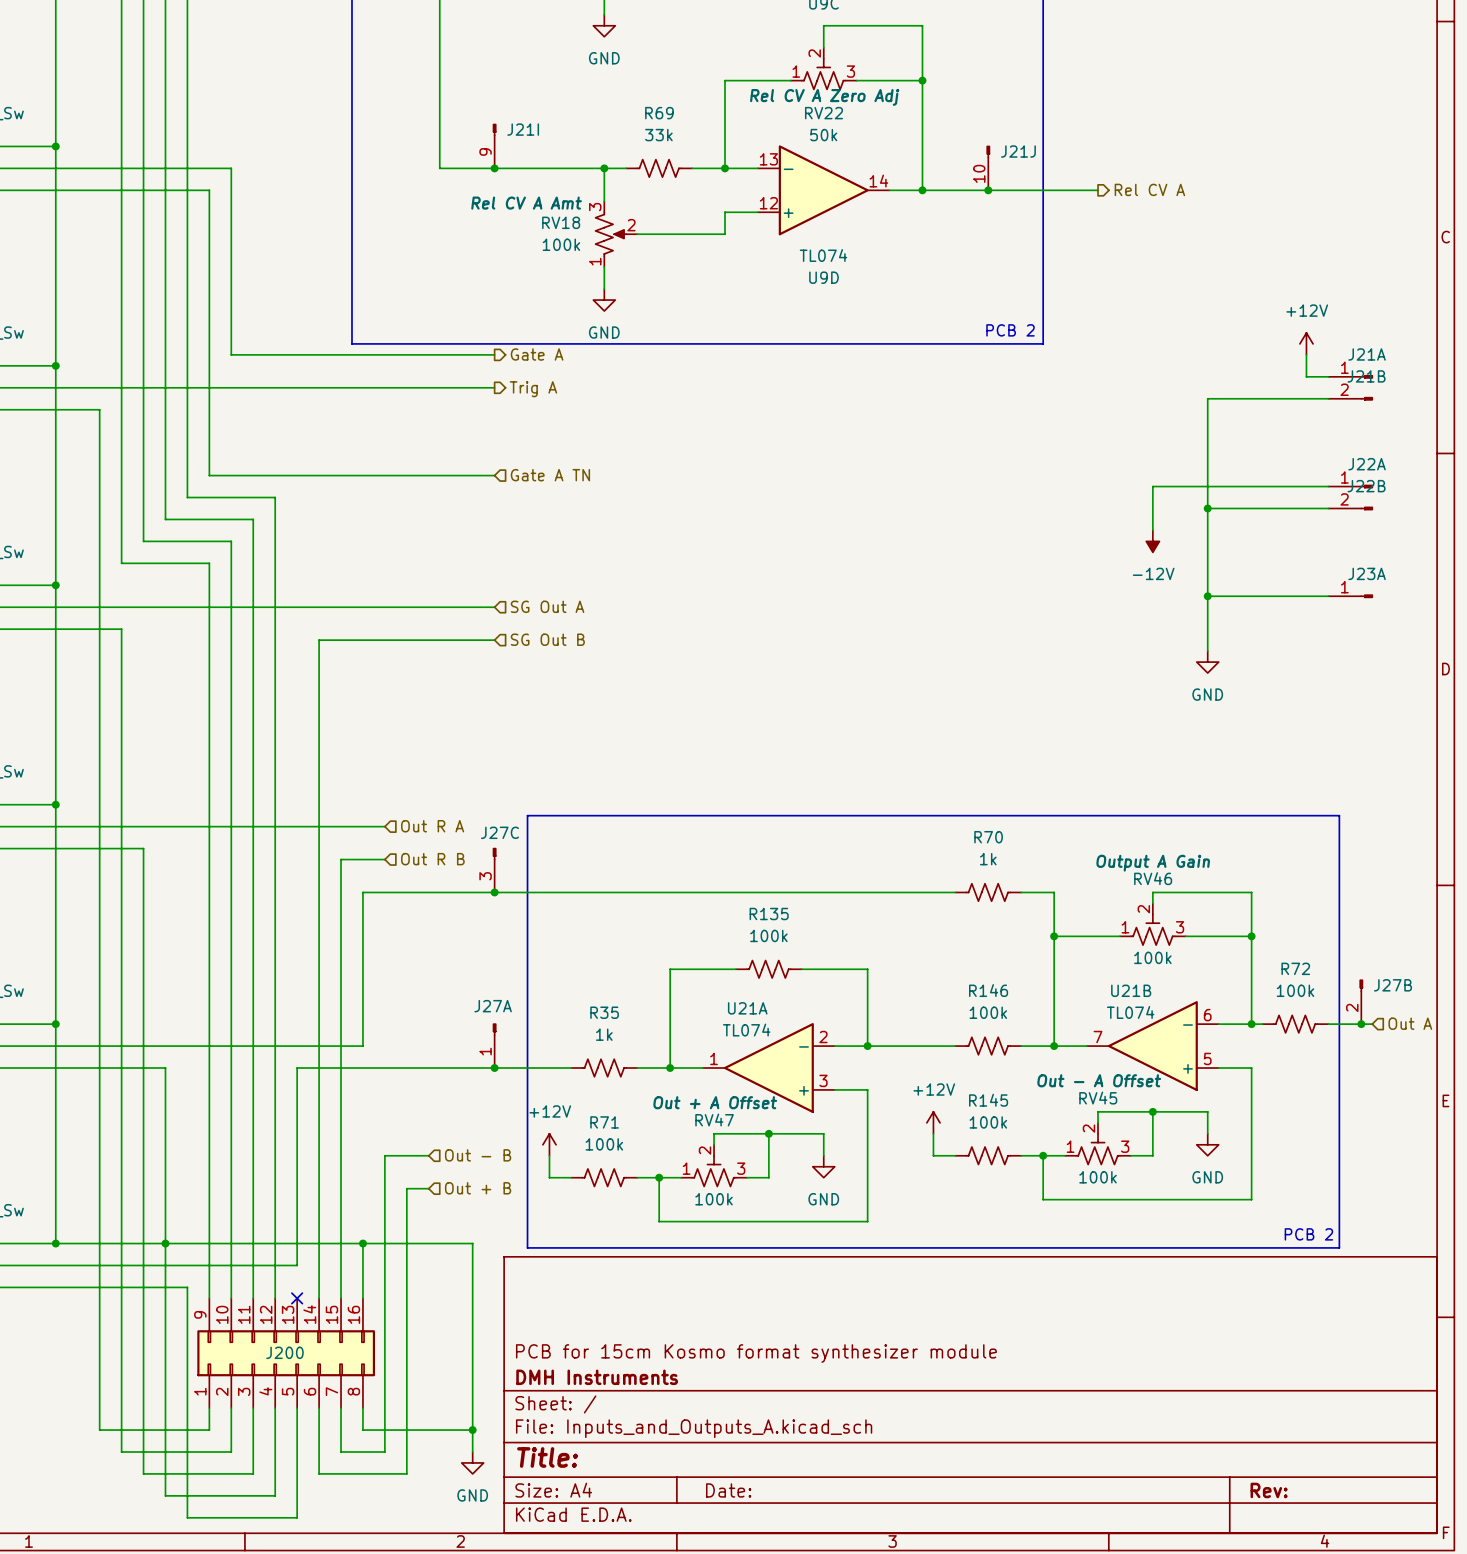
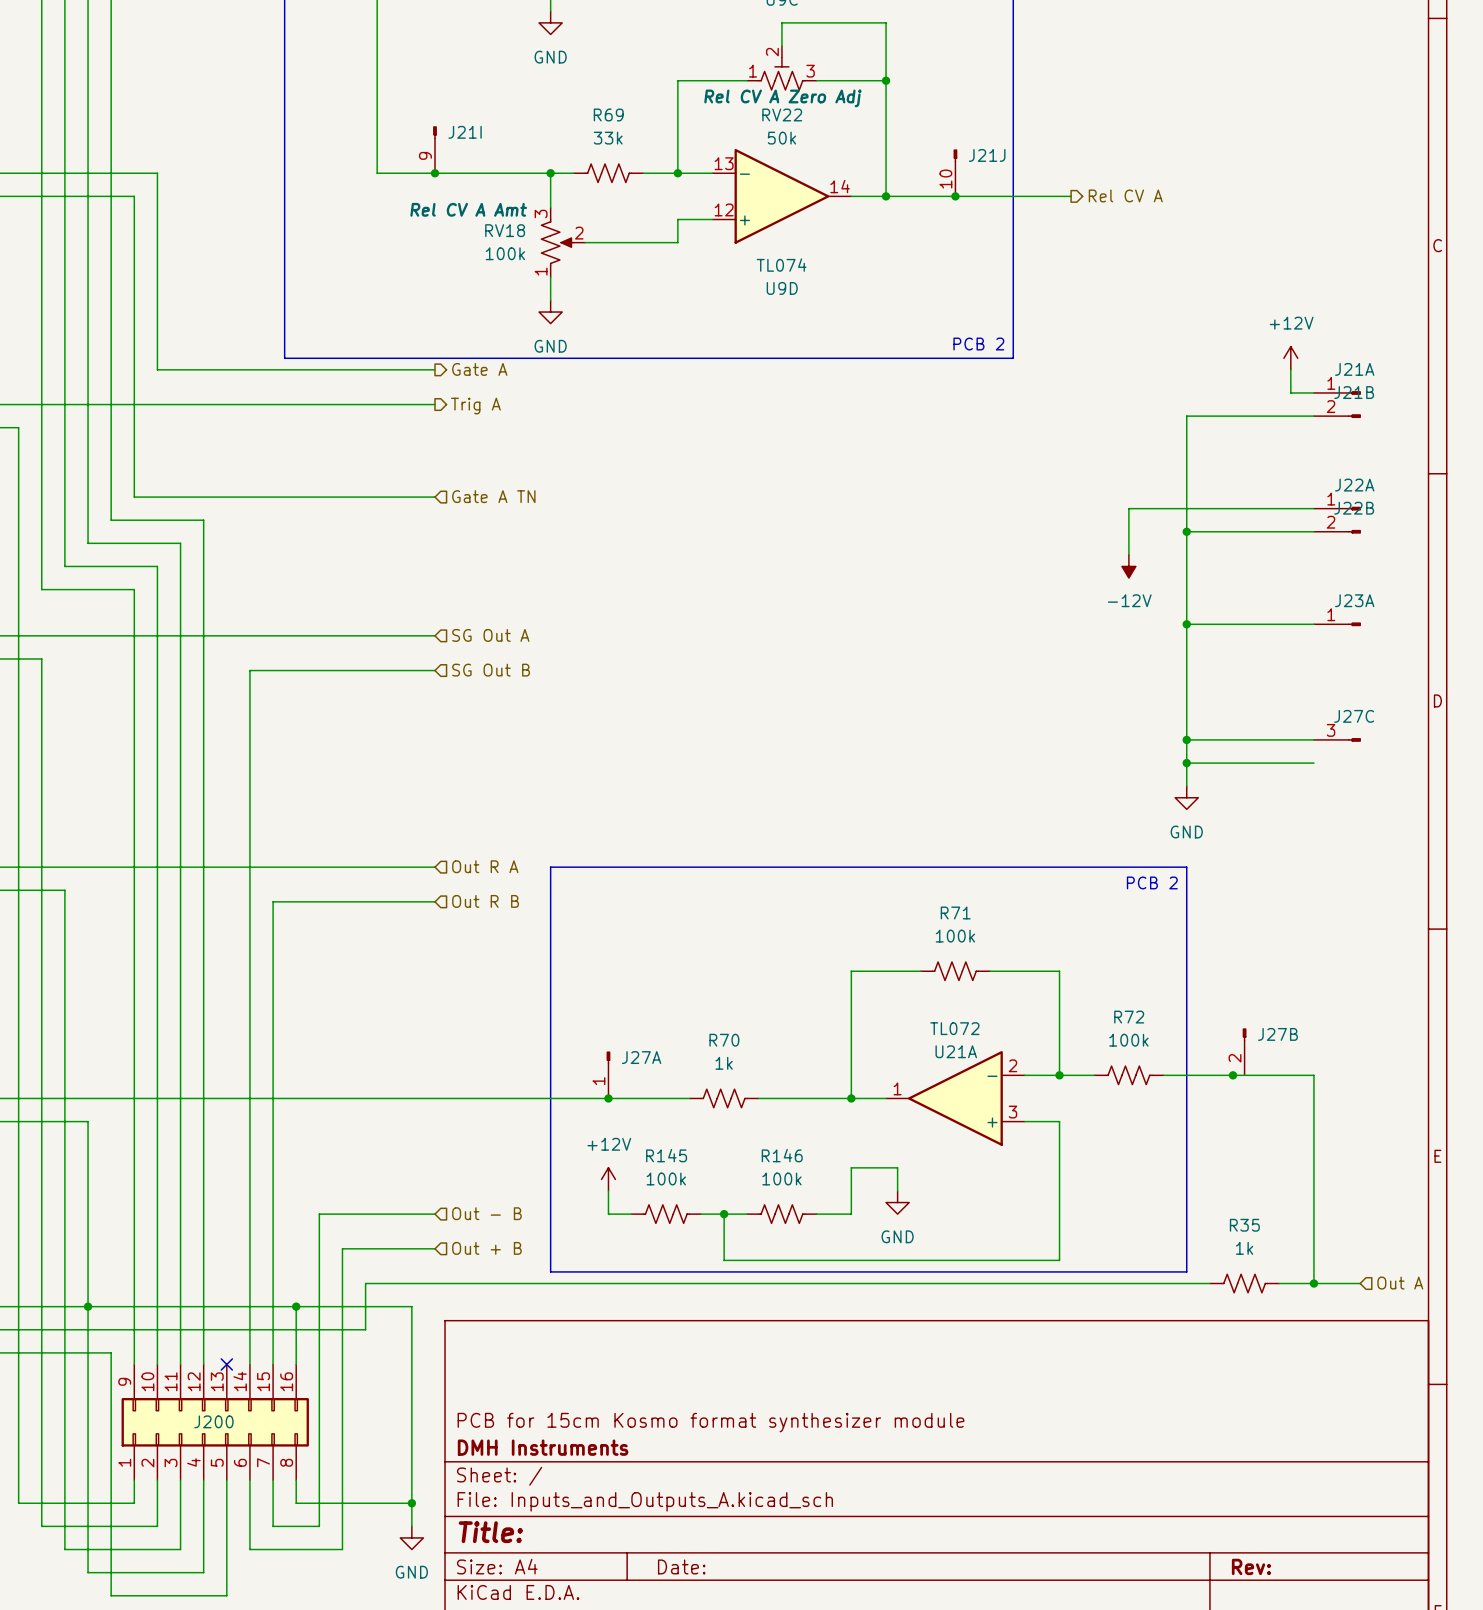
wire: none -> (1186, 682) (1186, 786)
power symbol position: GND (1207, 662) -> GND (1186, 797)
wire: none -> (1186, 739) (1313, 739)
junction: none -> (1186, 739)
wire: none -> (1186, 763) (1313, 763)
junction: none -> (1186, 763)
line: (527, 815) (1339, 815) (1339, 1247) (527, 1247) (527, 815) -> (550, 867) (550, 1271) (1186, 1271) (1186, 867) (550, 867)
wire: none -> (319, 867) (434, 867)
hierarchical label position: Out R A (432, 826) -> Out R A (485, 866)
text: none -> PCB 2 (1152, 882)
J27C rotation: 0° (494, 854) -> 90° clockwise (1354, 739)
wire: none -> (319, 901) (434, 901)
hierarchical label position: Out R B (432, 859) -> Out R B (485, 901)
J27C position: (494, 870) -> (1337, 739)
junction: (494, 892) -> none
wire: (955, 892) (362, 892) (362, 1046) -> (689, 1098) (296, 1098)
R70 position: (988, 892) -> (724, 1098)
wire: (1021, 892) (1054, 892) (1054, 1046) -> none
wire: (1152, 903) (1152, 892) (1251, 892) (1251, 1024) -> none
RV46: 100k (1152, 924) -> none
wire: none -> (920, 971) (851, 971) (851, 1098)
wire: none -> (990, 971) (1059, 971) (1059, 1075)
wire: (1054, 936) (1119, 936) -> none
junction: (1054, 936) -> none
wire: (1185, 936) (1251, 936) -> none
junction: (1251, 936) -> none
wire: (735, 969) (670, 969) (670, 1068) -> none
R135: 100k (768, 969) -> none
wire: (801, 969) (867, 969) (867, 1046) -> none
J27B position: (1361, 1001) -> (1244, 1051)
J27A name position: J27A (493, 1006) -> J27A (641, 1057)
U21A name position: U21A (747, 1008) -> U21A (956, 1051)
hierarchical label position: Out A (1410, 1023) -> Out A (1400, 1283)
wire: none -> (1244, 1075) (1313, 1075) (1313, 1283)
R72 position: (1295, 1024) -> (1128, 1075)
wire: (1328, 1024) (1372, 1024) -> none
junction: (1361, 1024) -> none
U21A value: TL074 (746, 1030) -> TL072 (954, 1028)
J27A position: (494, 1045) -> (608, 1074)
junction position: (867, 1046) -> (851, 1098)
R146 position: (988, 1046) -> (781, 1214)
wire: (1021, 1046) (1087, 1046) -> (1024, 1075) (1094, 1075)
junction position: (1054, 1046) -> (1059, 1075)
U21B: TL074 (1152, 1046) -> none
junction: (494, 1068) -> none
wire: (571, 1068) (297, 1068) (297, 1265) -> (608, 1283) (365, 1283) (365, 1329) (226, 1329)
R35 position: (604, 1068) -> (1244, 1283)
wire: (637, 1068) (703, 1068) -> none
junction position: (670, 1068) -> (608, 1098)
U21A position: (768, 1068) -> (955, 1098)
wire: (1218, 1068) (1251, 1068) (1251, 1199) (1087, 1199) -> (1024, 1121) (1059, 1121) (1059, 1260)
wire: (834, 1089) (867, 1089) (867, 1221) -> (1209, 1283) (828, 1283)
wire: (1152, 1111) (1152, 1155) (1130, 1155) -> none
junction: (1152, 1111) -> none
power symbol: +12V (933, 1122) -> none
wire: (1098, 1122) (1098, 1111) (1207, 1111) (1207, 1133) -> none
wire: (768, 1133) (768, 1155) -> none
junction position: (768, 1133) -> (724, 1214)
wire: (933, 1133) (933, 1155) (955, 1155) -> (897, 1190) (897, 1167) (851, 1167) (851, 1214) (816, 1214)
RV45: 100k (1098, 1143) -> none
power symbol position: +12V (549, 1144) -> +12V (608, 1179)
wire: (714, 1144) (714, 1133) (823, 1133) (823, 1155) -> none
power symbol: GND (1207, 1144) -> none
wire: none -> (365, 1214) (434, 1214)
hierarchical label position: Out - B (478, 1155) -> Out - B (486, 1213)
wire: (549, 1155) (549, 1177) (571, 1177) -> (608, 1190) (608, 1214) (631, 1214)
R145 position: (988, 1155) -> (666, 1214)
wire: (1021, 1155) (1065, 1155) -> none
wire: (1043, 1155) (1043, 1199) -> (724, 1237) (724, 1260) (1013, 1260)
junction: (1043, 1155) -> none
RV47: 100k (714, 1165) -> none
power symbol position: GND (823, 1166) -> GND (897, 1202)
R71 position: (604, 1177) -> (955, 971)
wire: (637, 1177) (681, 1177) -> (700, 1214) (747, 1214)
wire: (659, 1177) (659, 1221) -> none
junction: (659, 1177) -> none
wire: (746, 1177) (768, 1177) -> none
wire: none -> (365, 1248) (434, 1248)
hierarchical label position: Out + B (478, 1188) -> Out + B (486, 1248)
wire: none -> (1279, 1283) (1360, 1283)
junction: none -> (1313, 1283)
text: PCB 2 (1308, 1234) -> none

